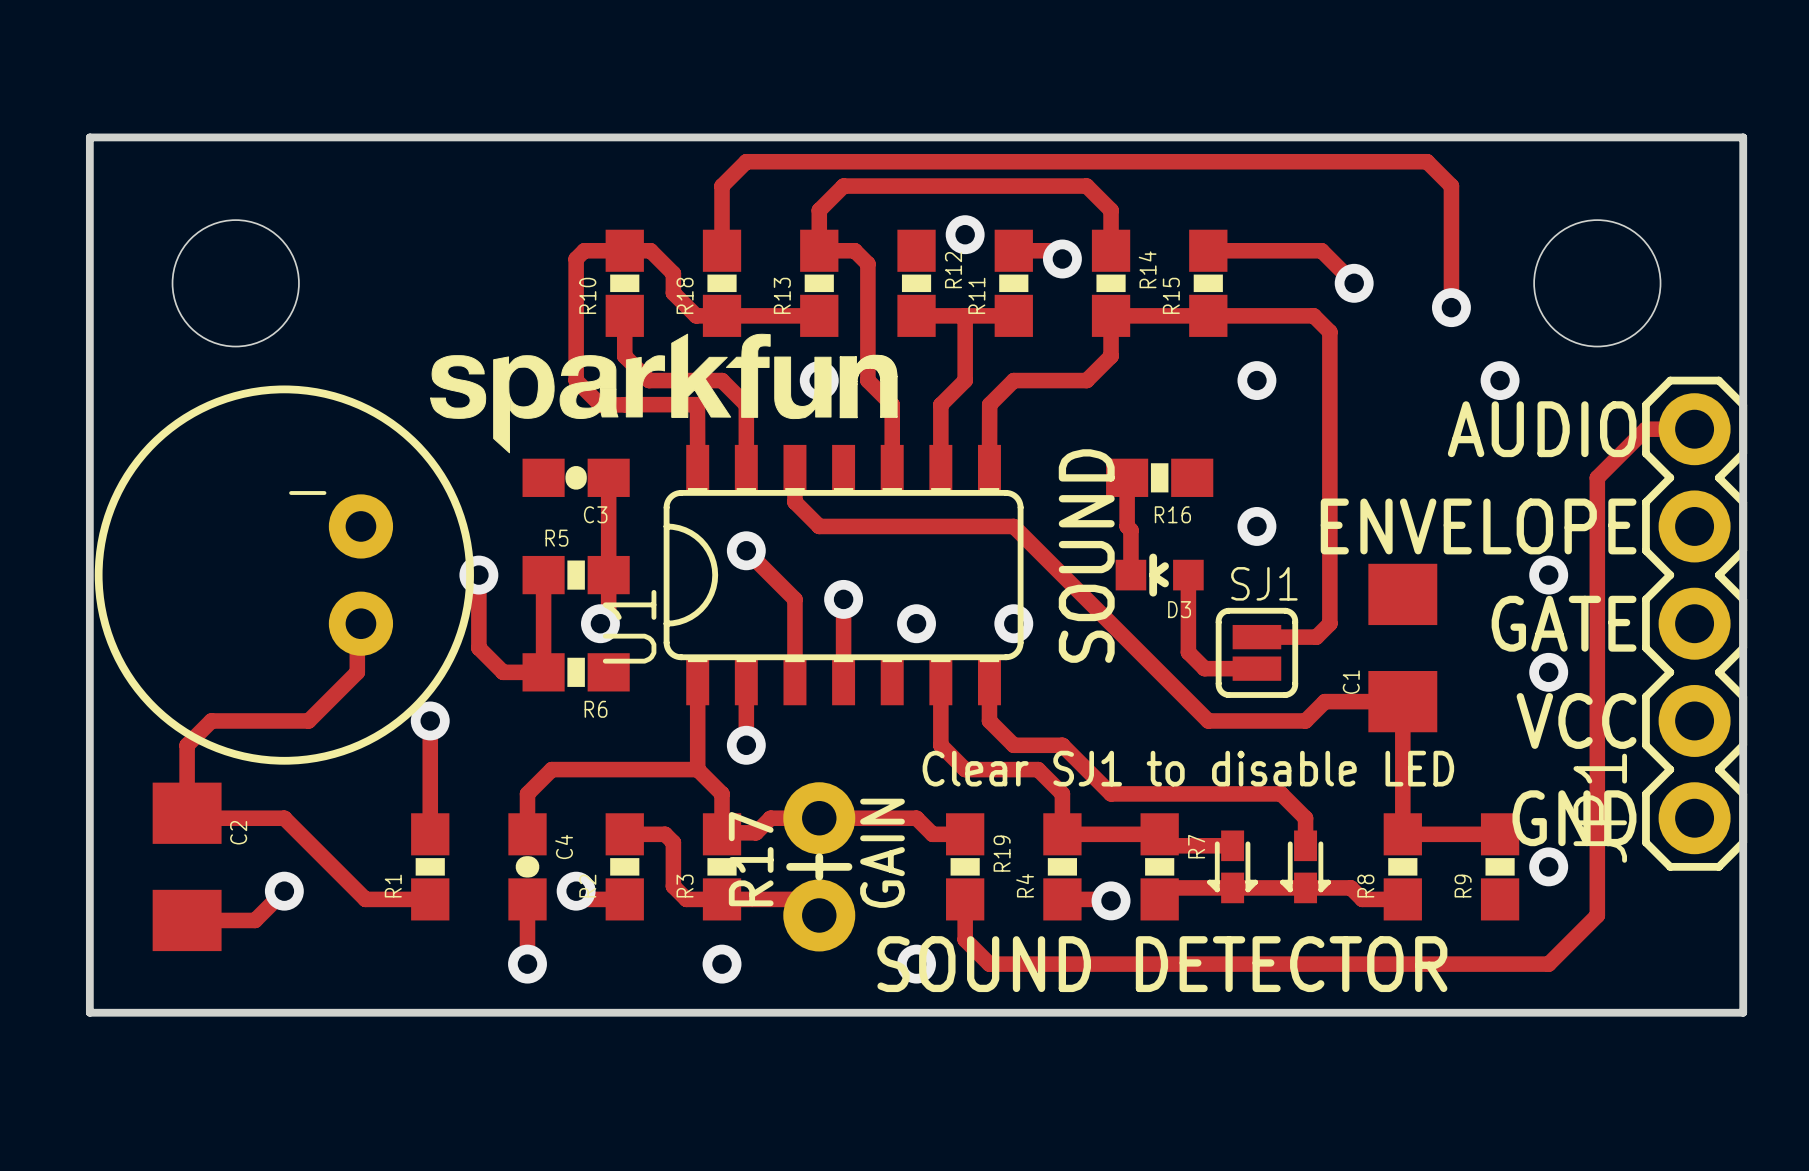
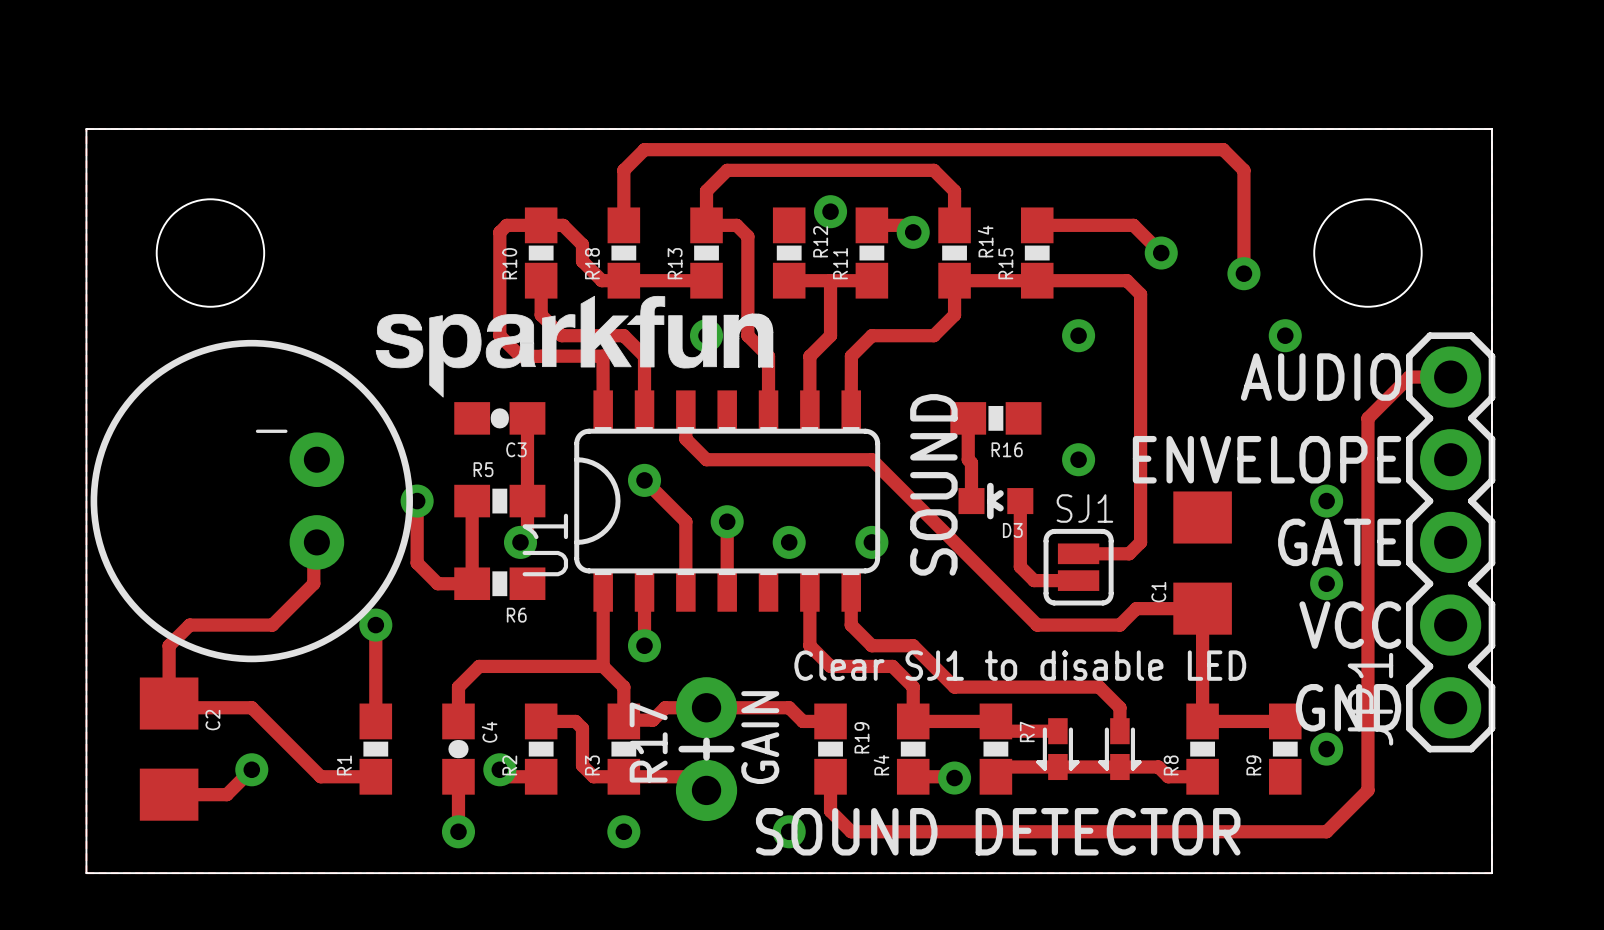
board edge width: thick (89, 137) (1743, 137) (1743, 1012) (89, 1012) (89, 137) -> thin (86, 129) (1491, 129) (1491, 873) (86, 873) (86, 129)

